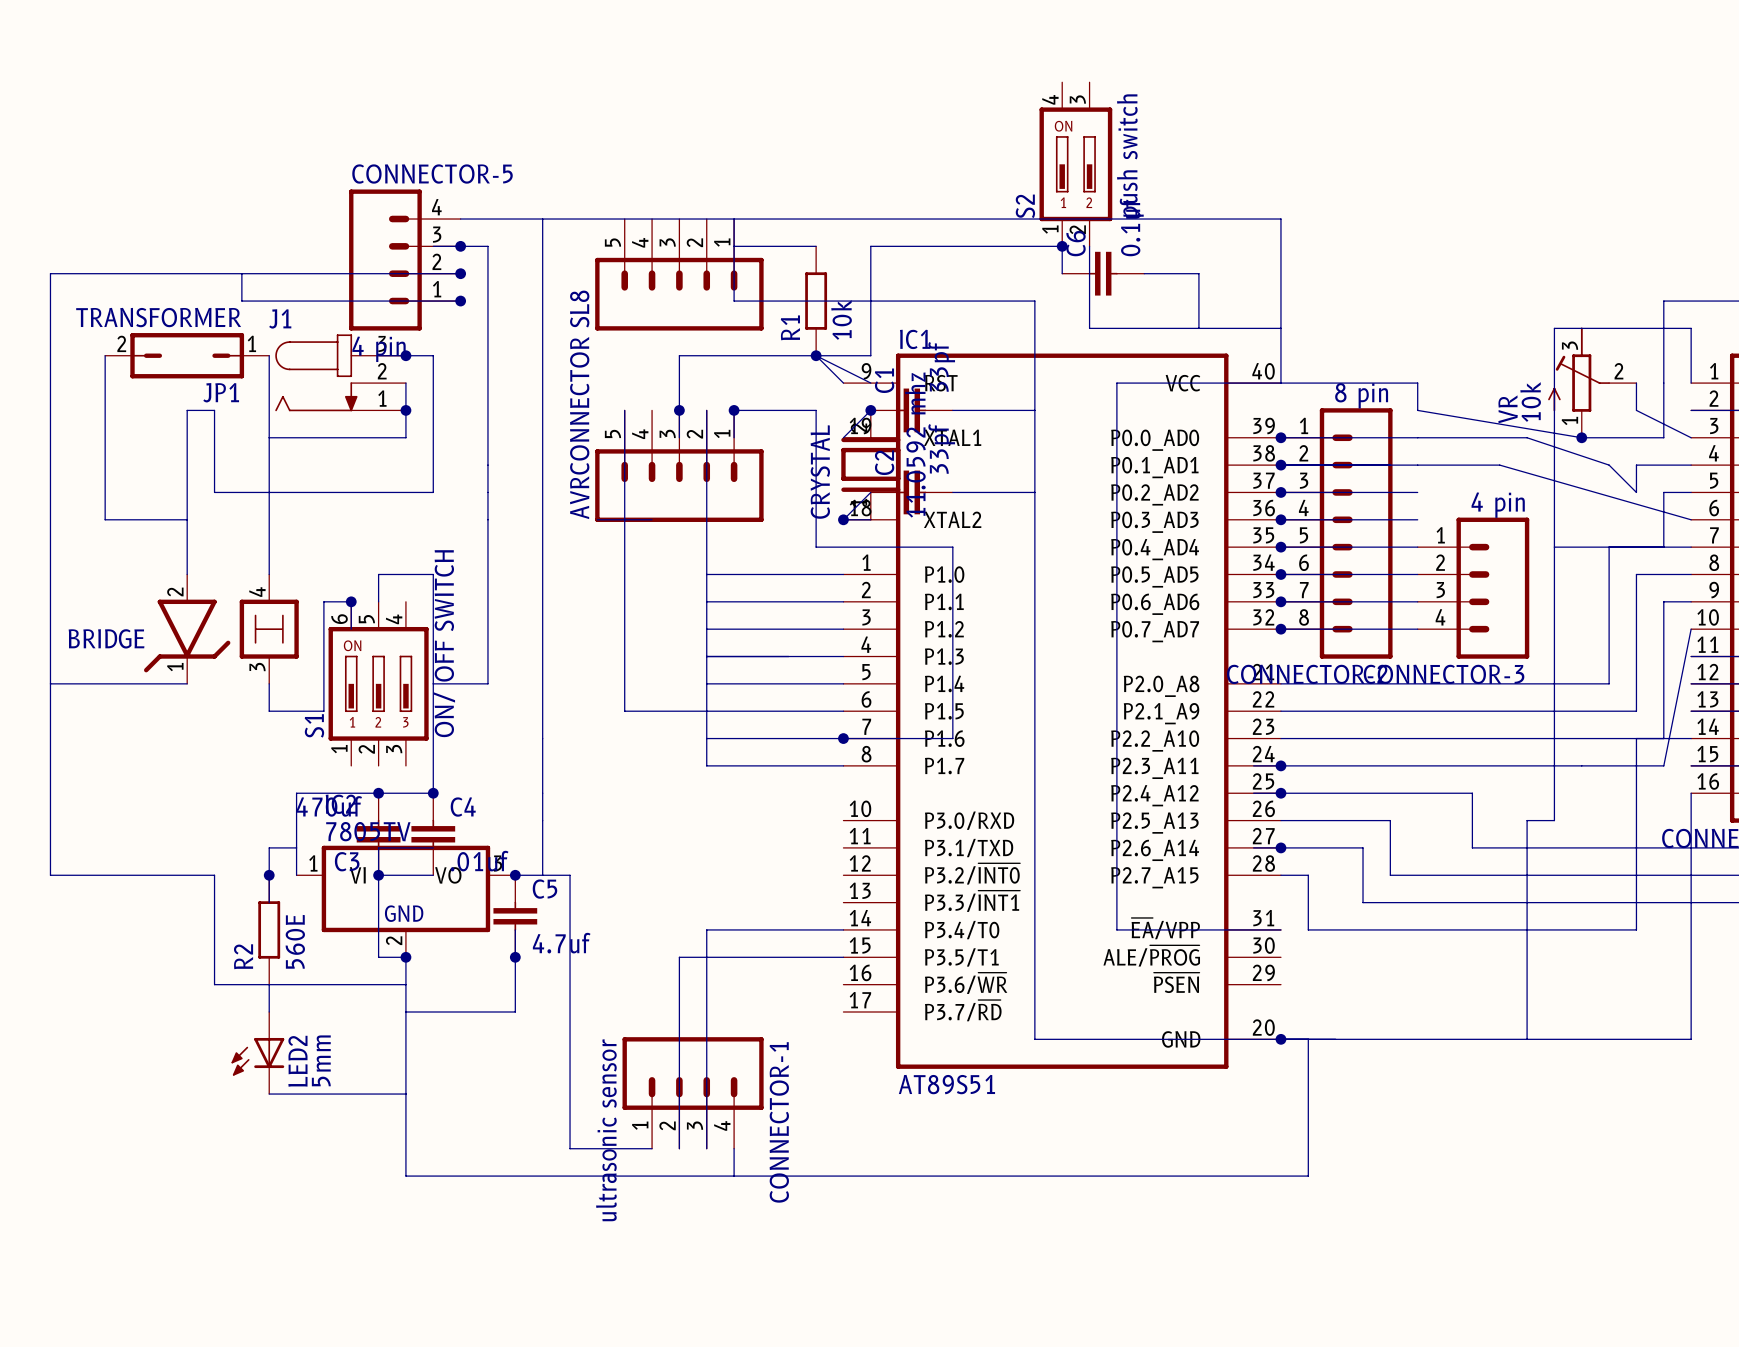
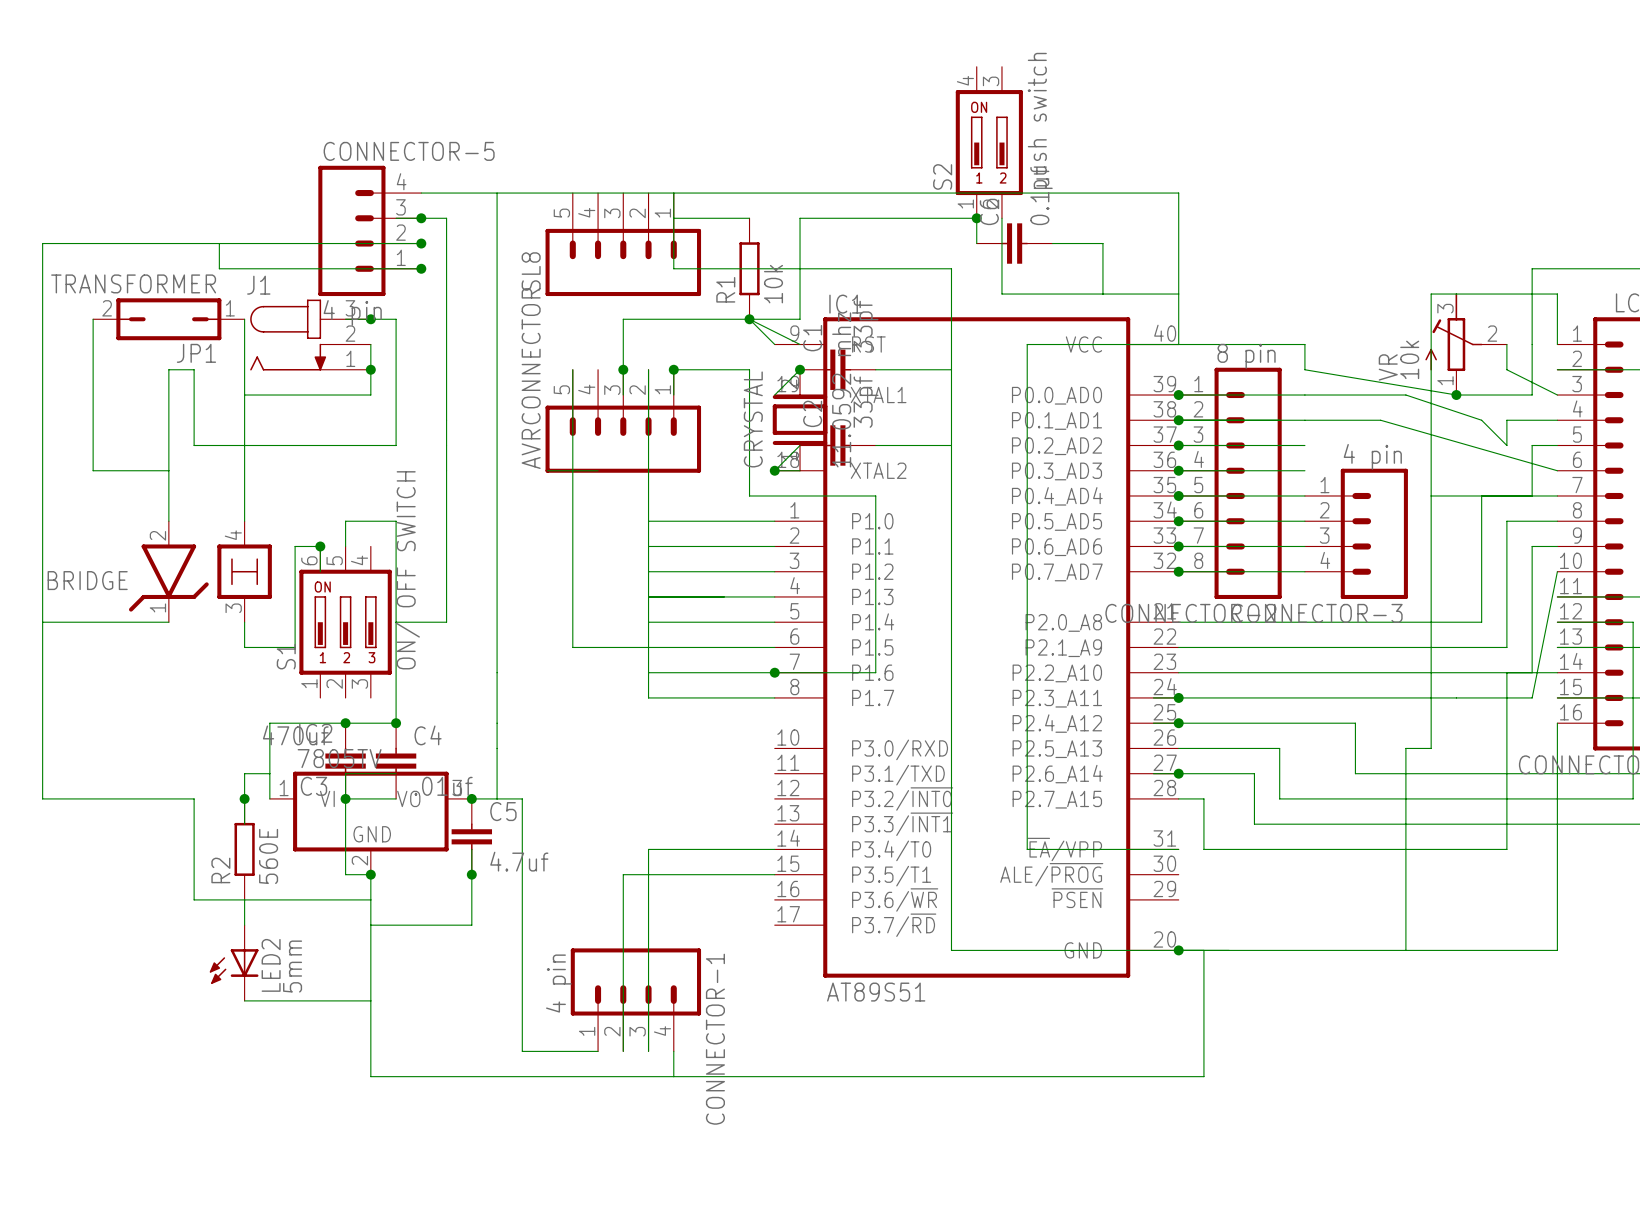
CONNECTOR-1 value: ultrasonic sensor (606, 1130) -> 4 pin (558, 983)

